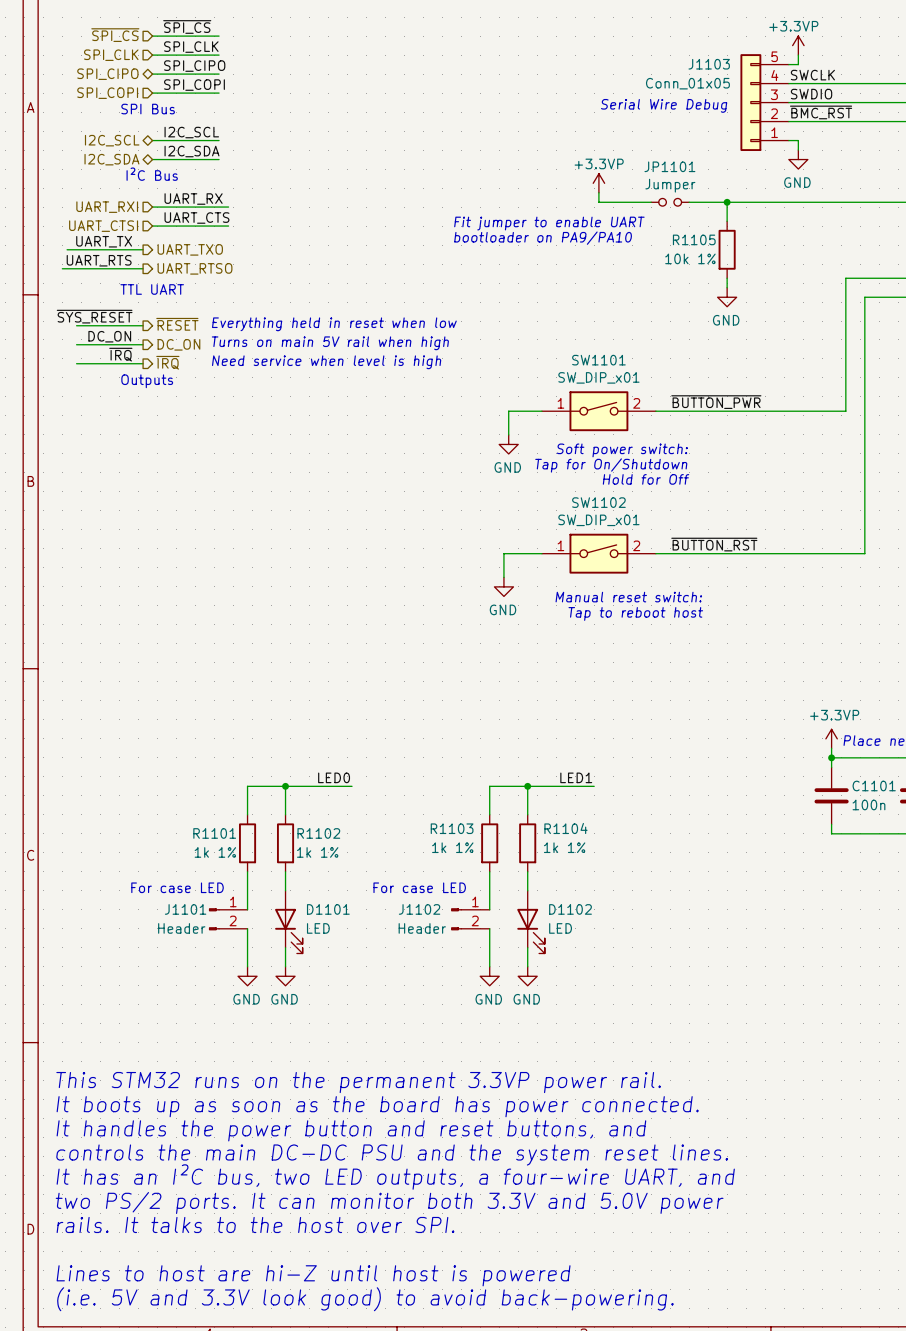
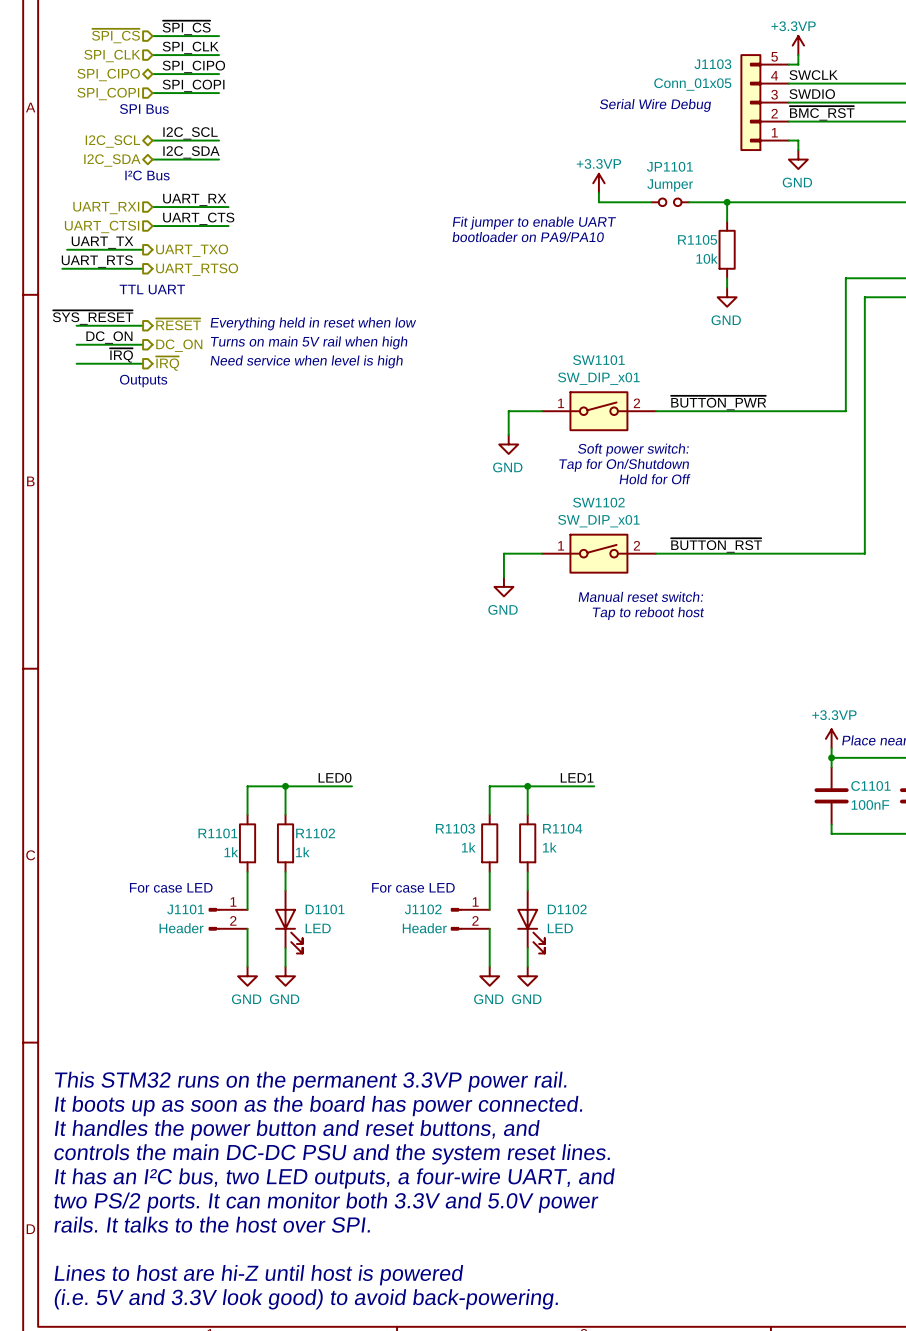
R1105 value: 10k 1% (690, 258) -> 10k (707, 258)
C1101 value: 100n (868, 804) -> 100nF (870, 804)
R1103 value: 1k 1% (452, 847) -> 1k (468, 847)
R1104 value: 1k 1% (564, 847) -> 1k (549, 847)
R1101 value: 1k 1% (215, 852) -> 1k (231, 852)
R1102 value: 1k 1% (317, 852) -> 1k (302, 852)

